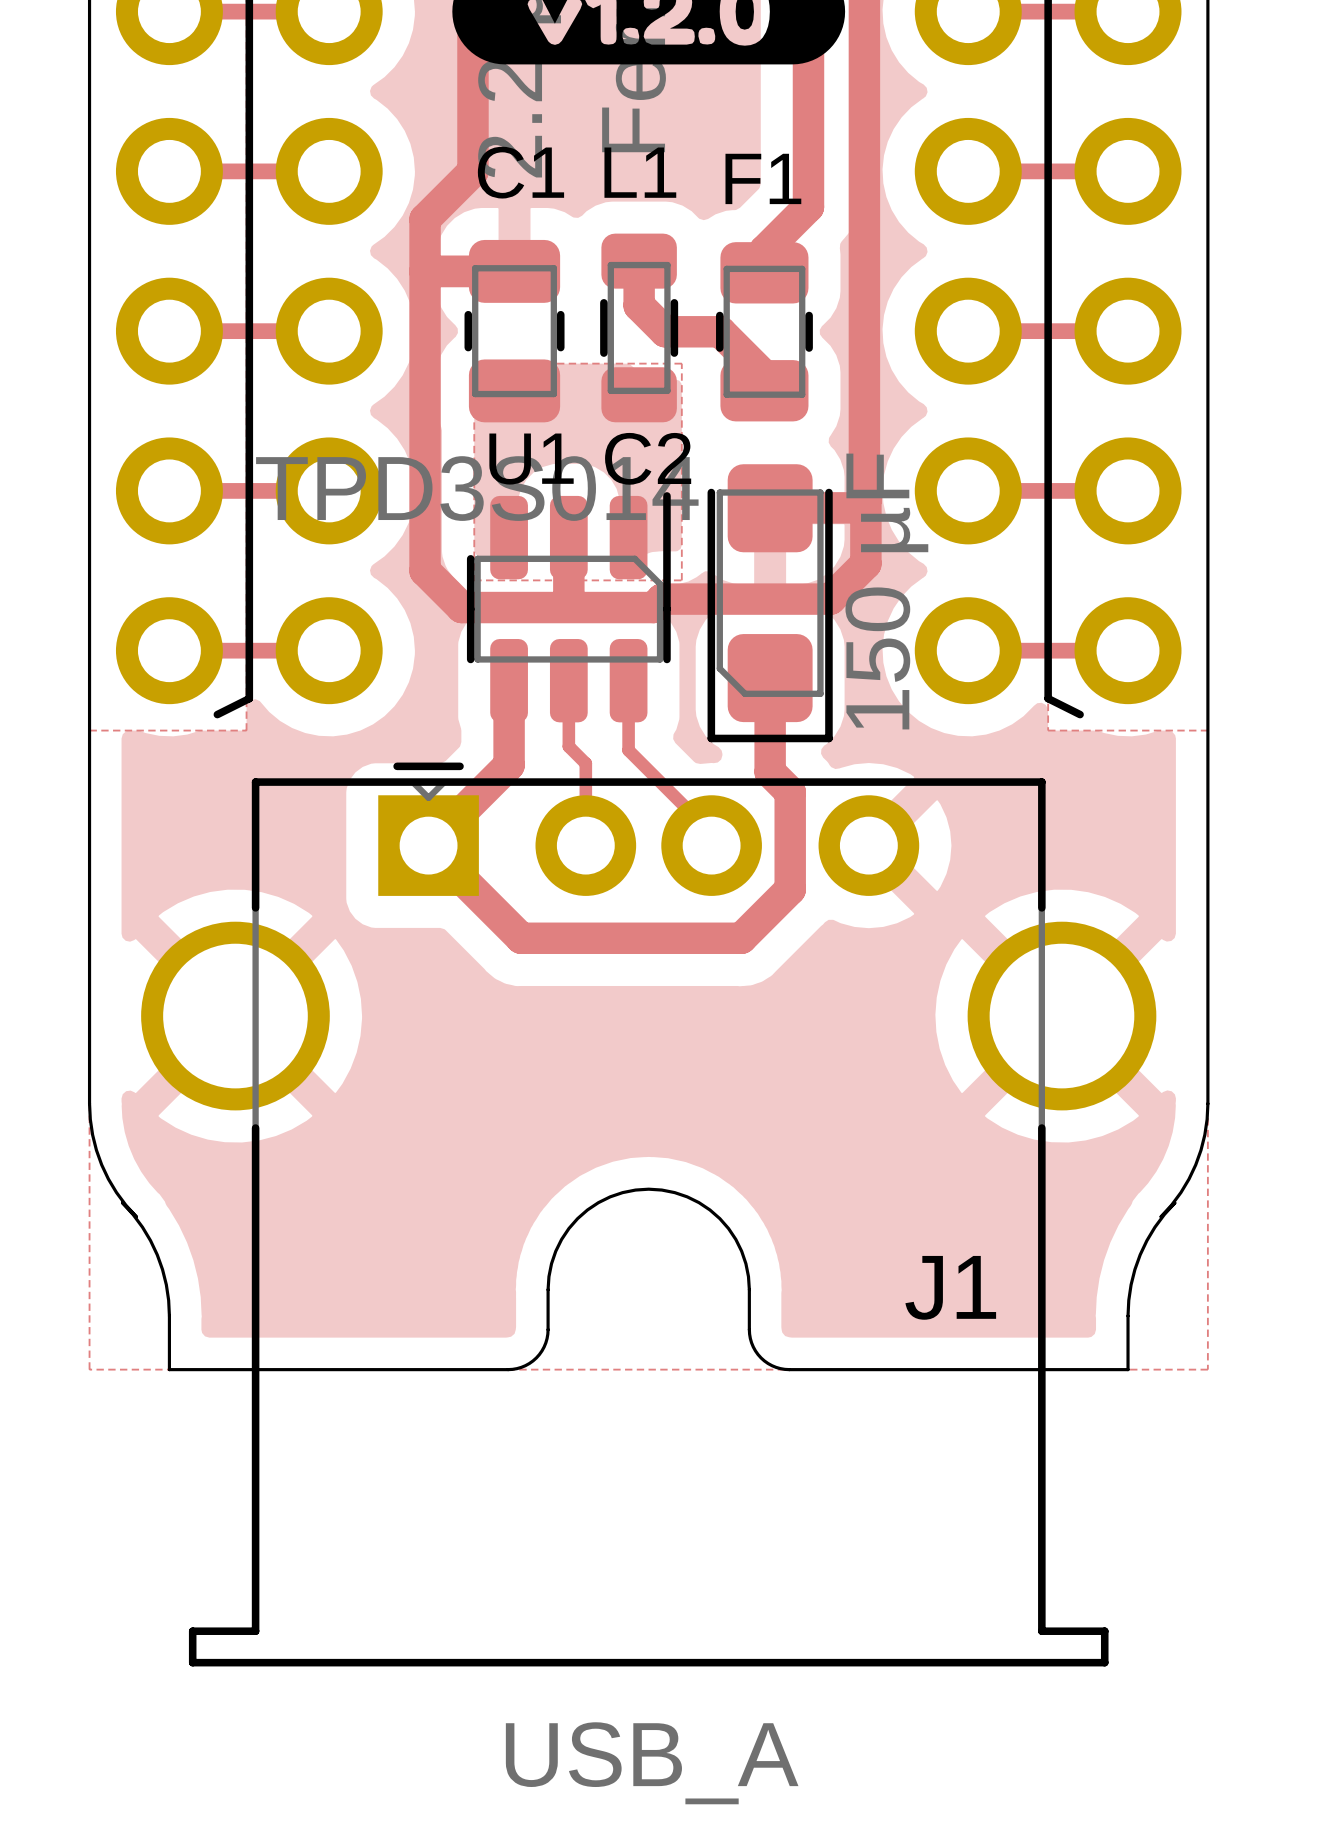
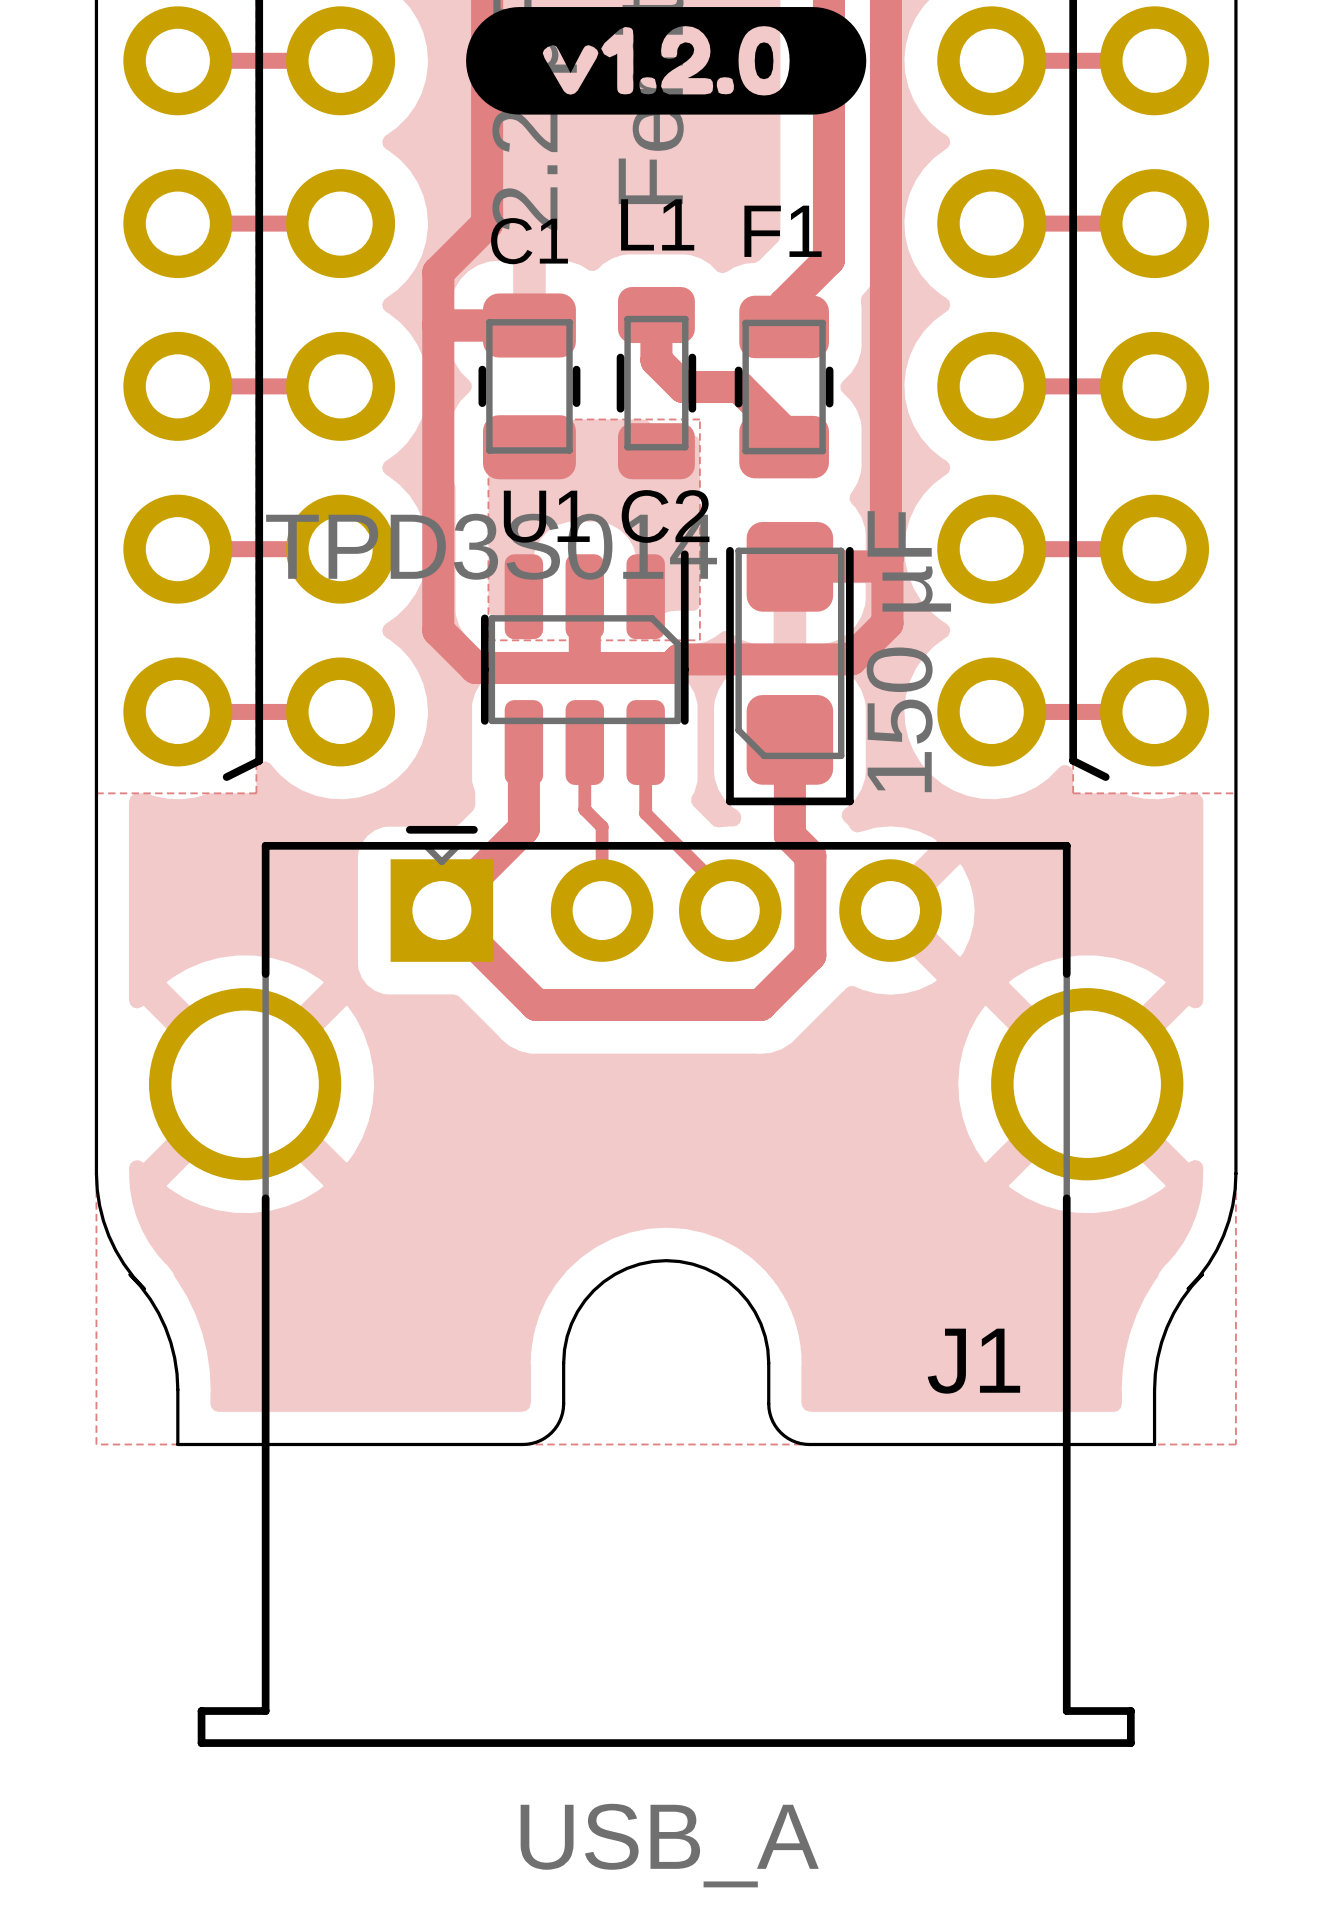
C1 name position: C1 (520, 172) -> C1 (529, 241)

